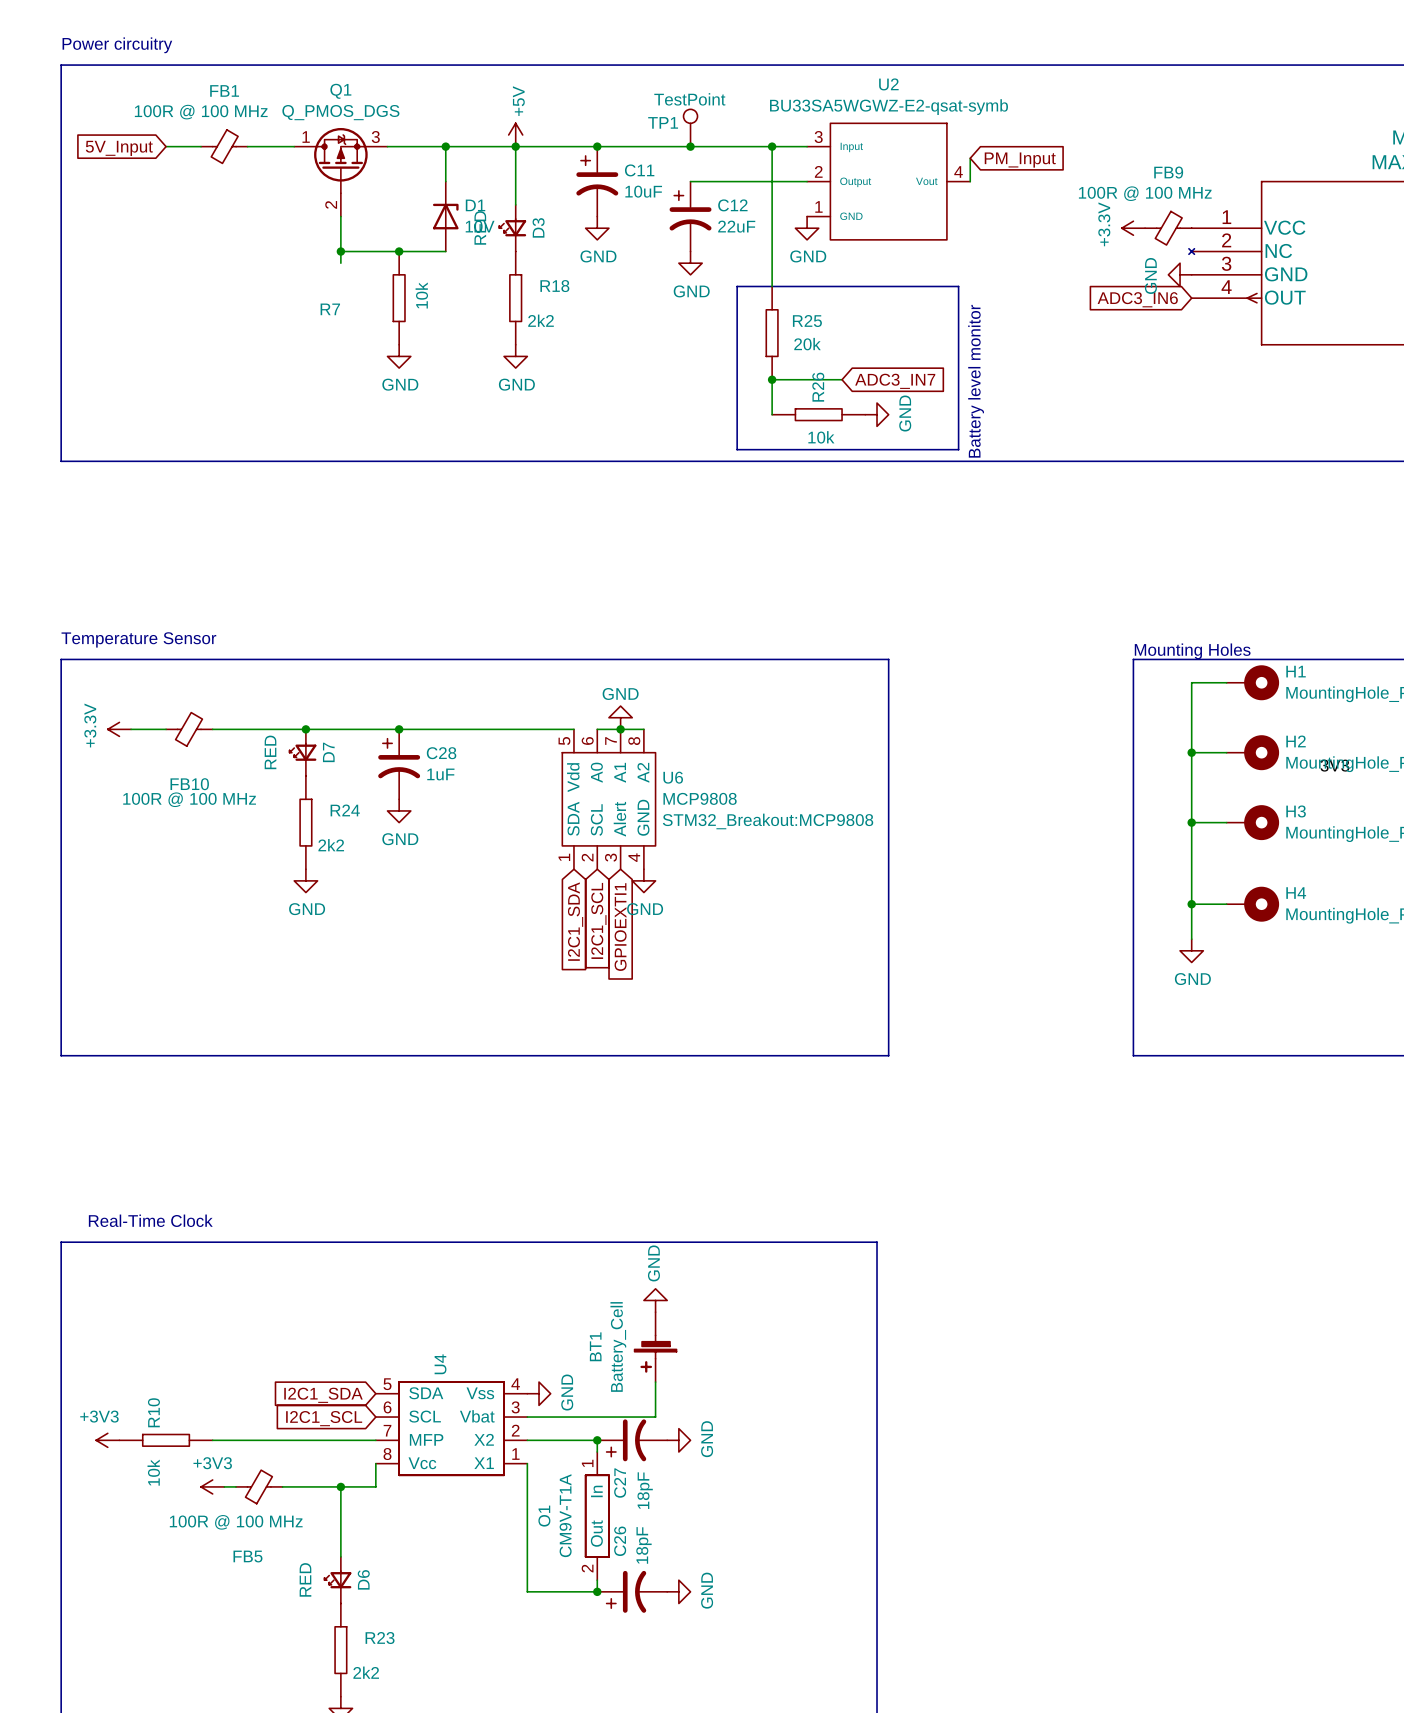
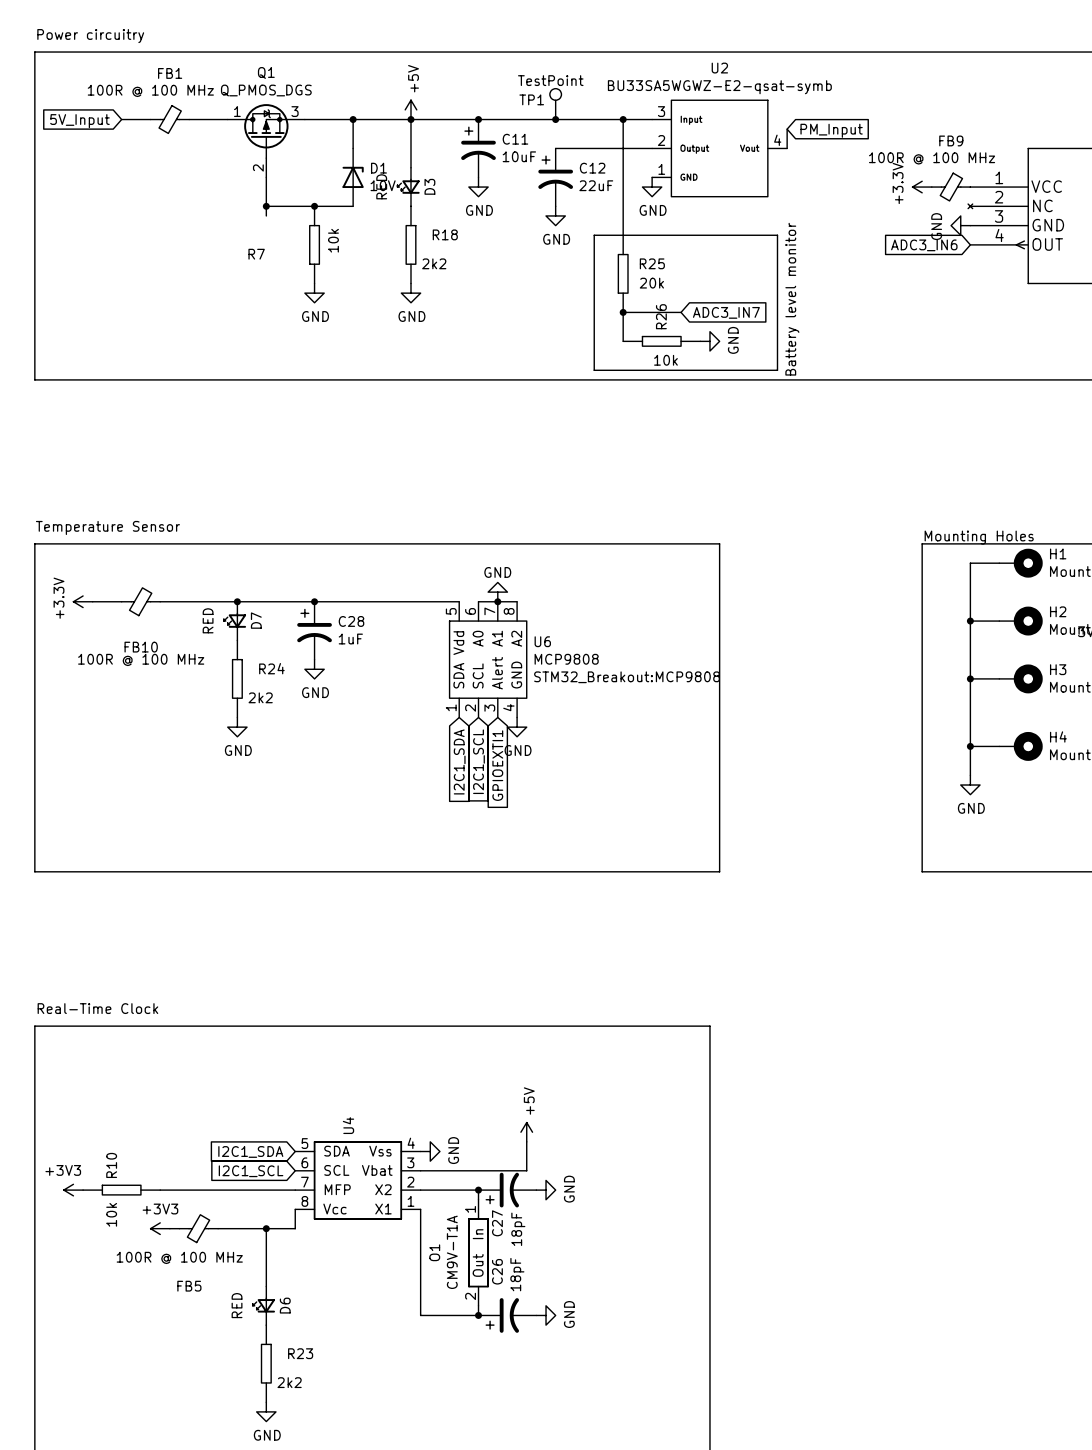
power symbol: GND (655, 1300) -> none
BT1: Battery_Cell (655, 1347) -> none
power symbol: none -> +5V (526, 1132)

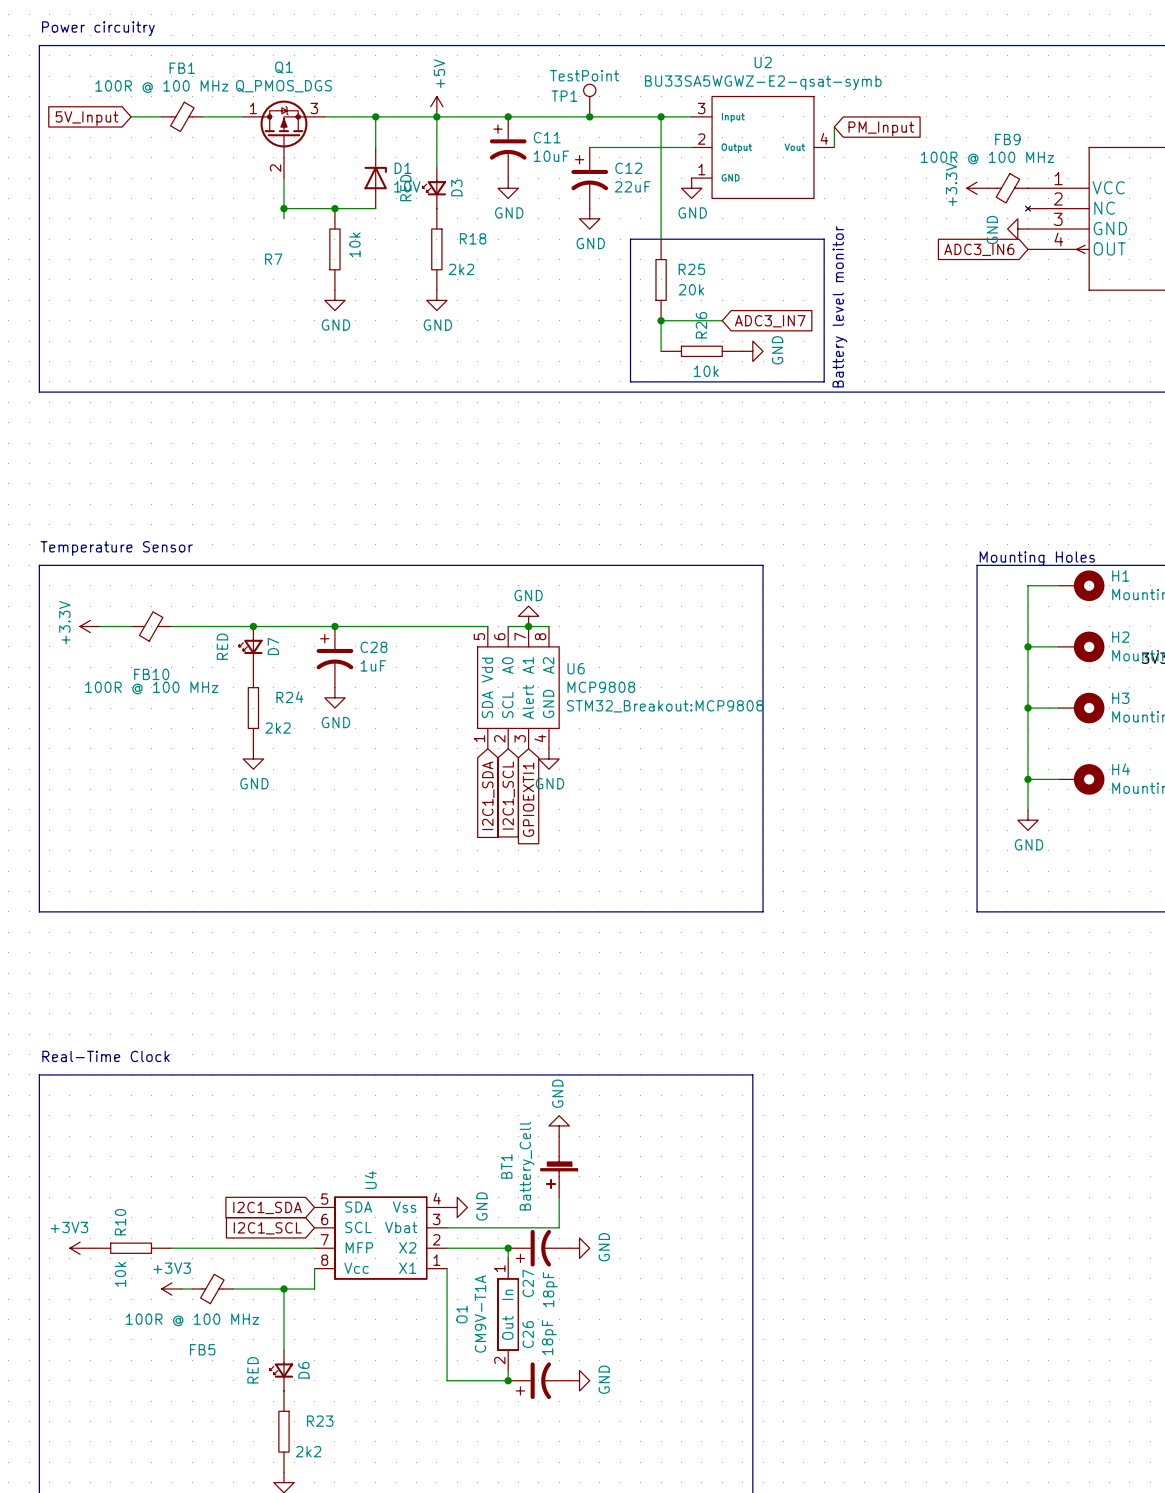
power symbol: none -> GND (559, 1125)
BT1: none -> Battery_Cell (559, 1166)
power symbol: +5V (526, 1132) -> none

